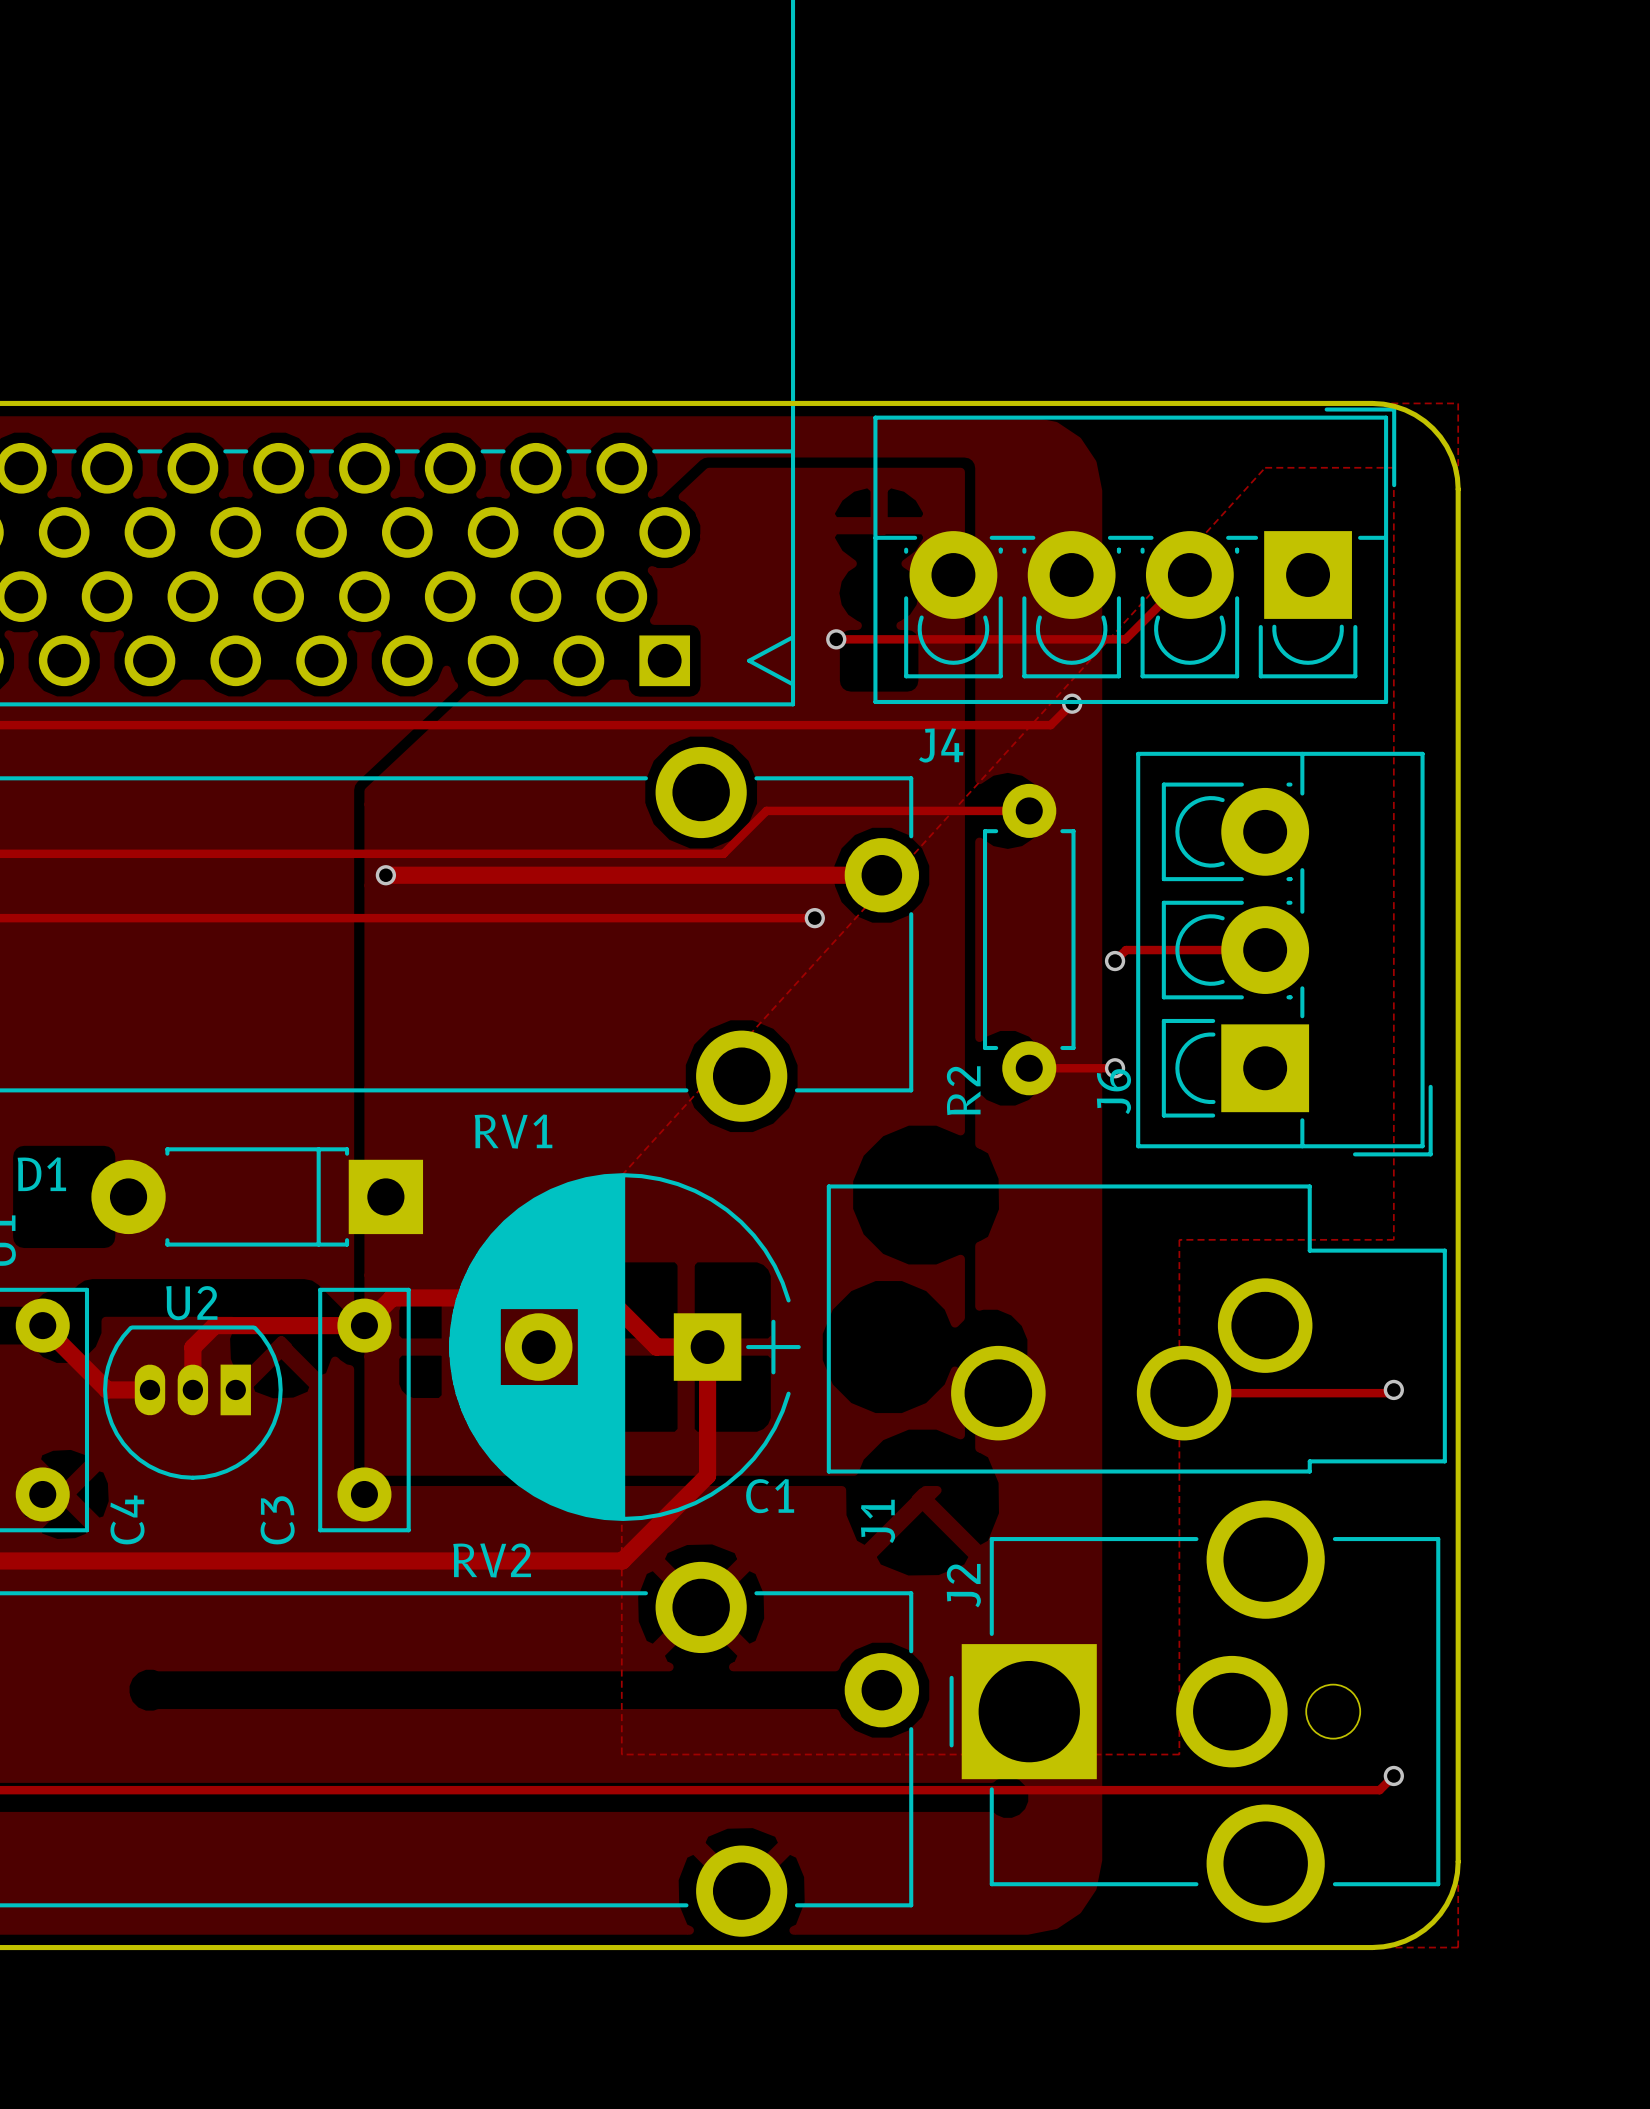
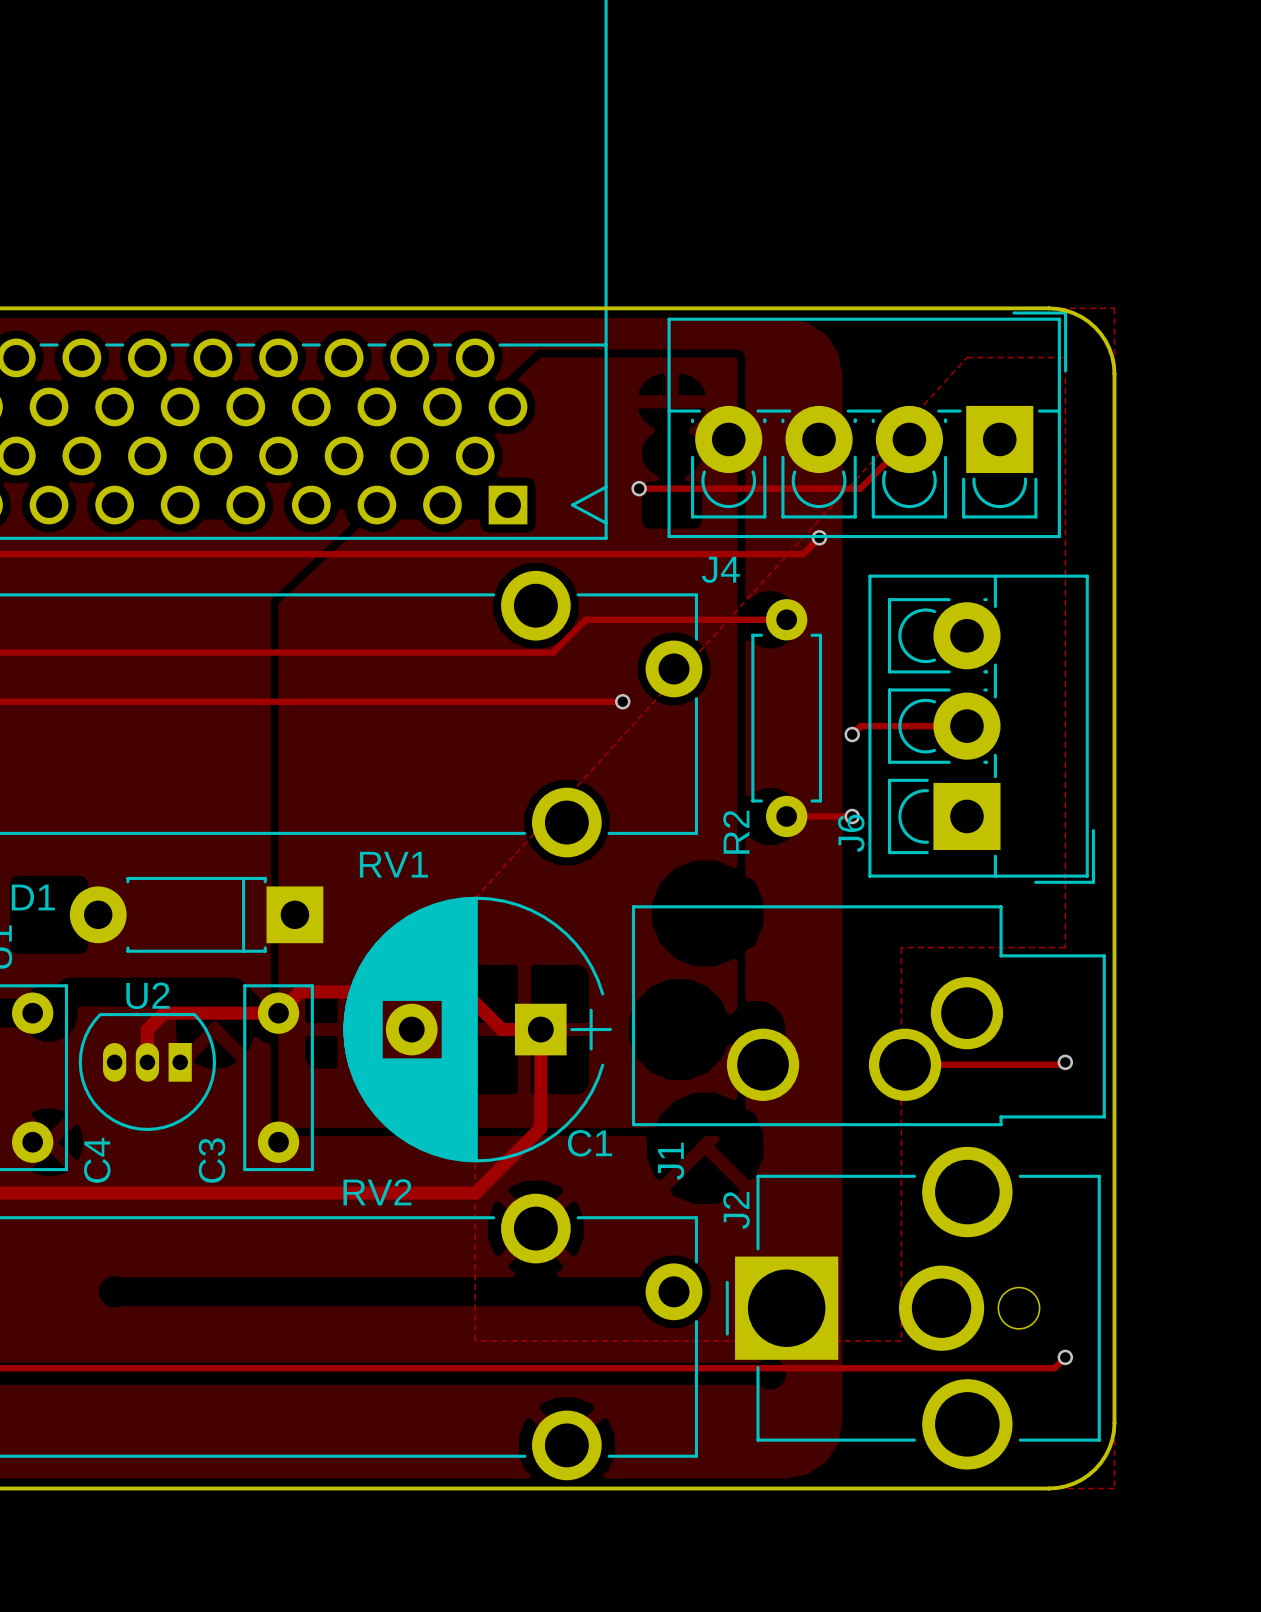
track: (385, 875) (881, 875) -> none
via: (385, 875) -> none
track: (42, 1325) (107, 1389) (149, 1389) -> none

